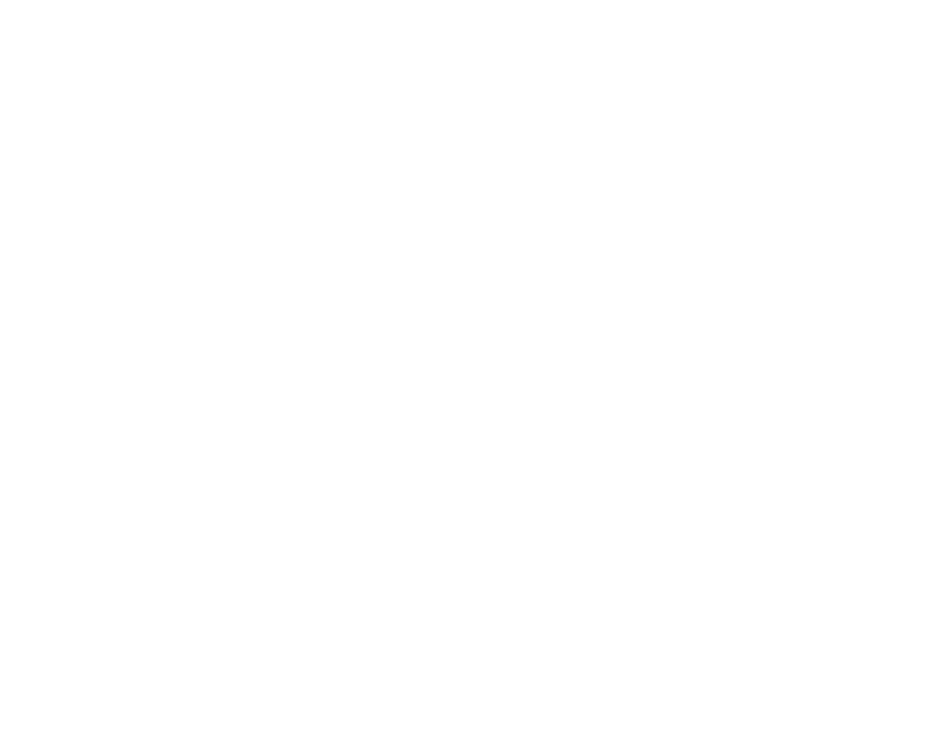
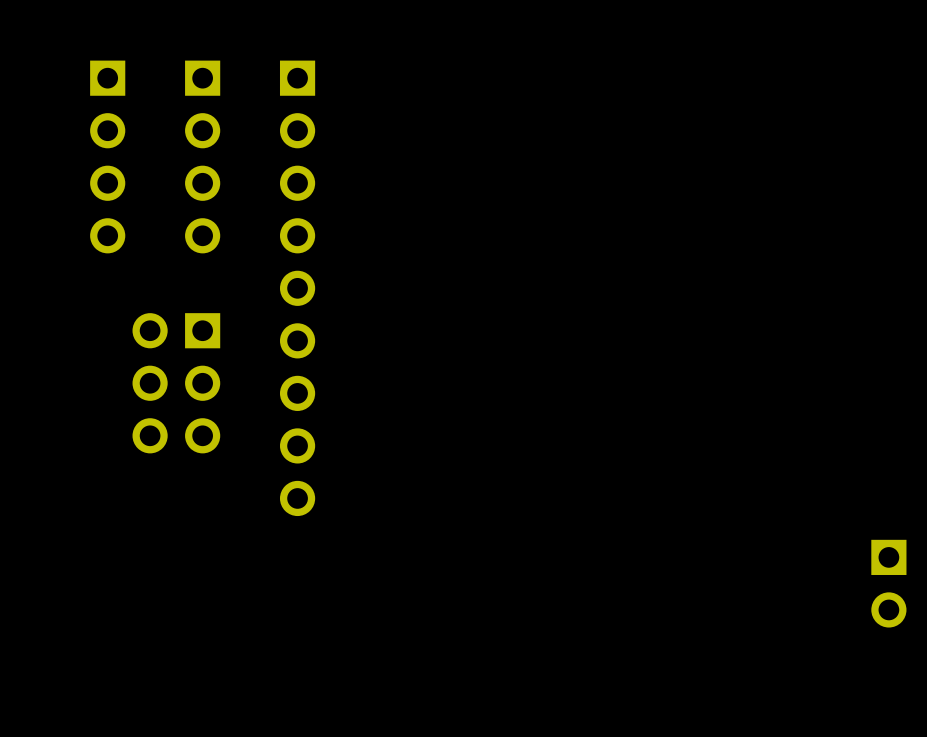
part: none -> (107, 156)
part: none -> (202, 156)
part: none -> (297, 288)
part: none -> (176, 383)
part: none -> (888, 583)

